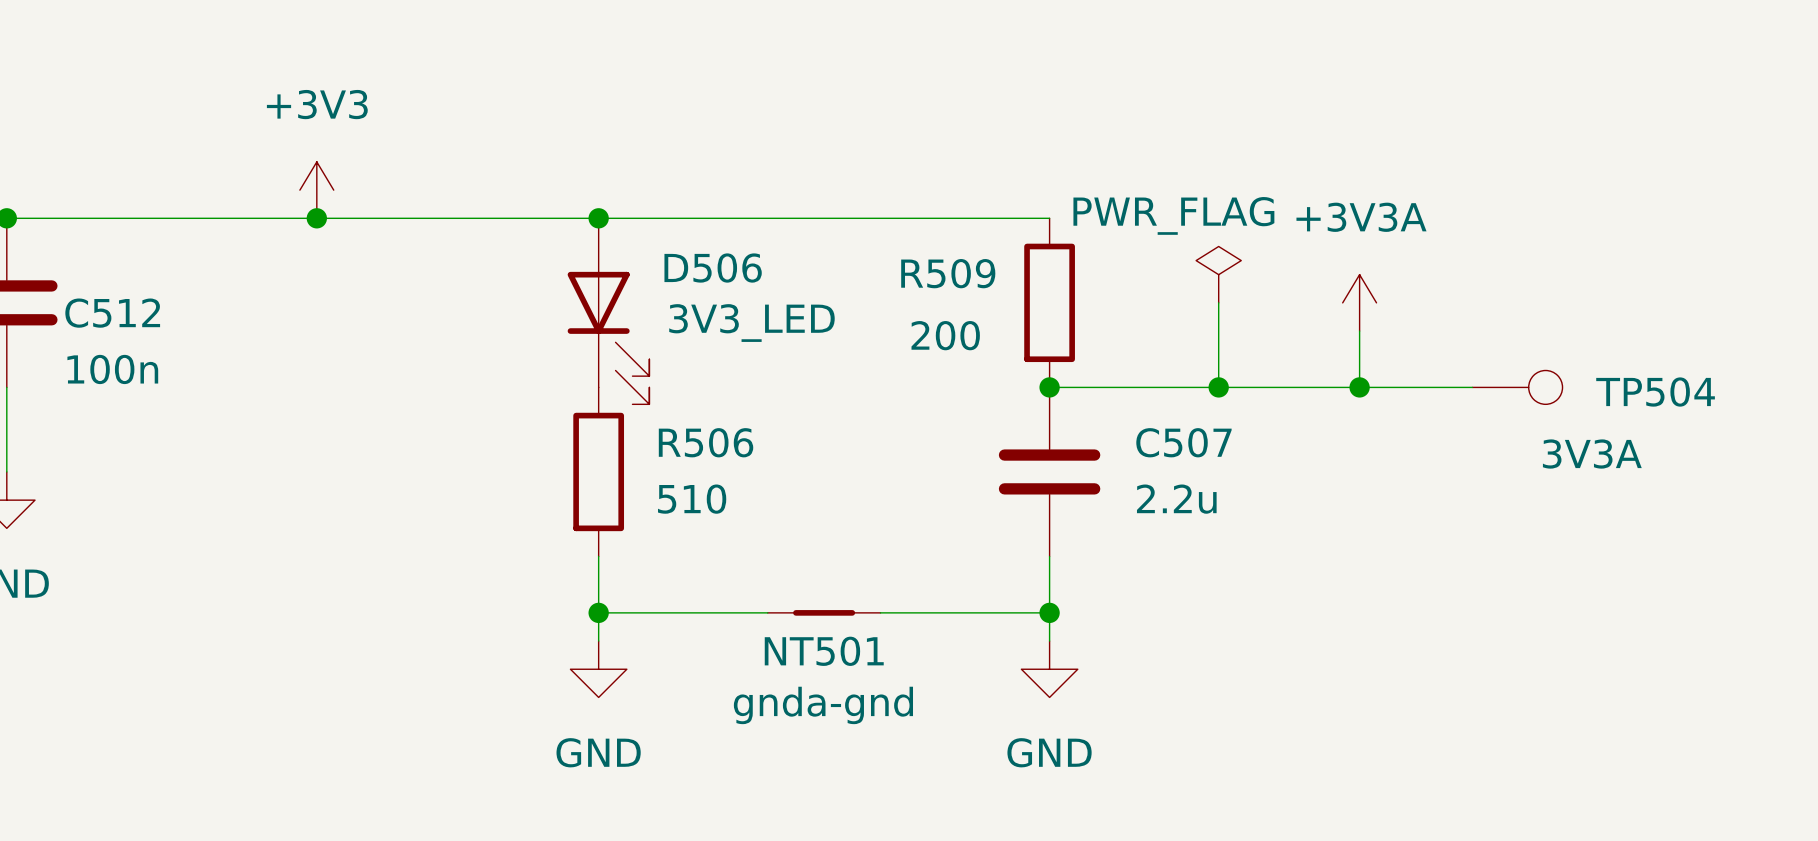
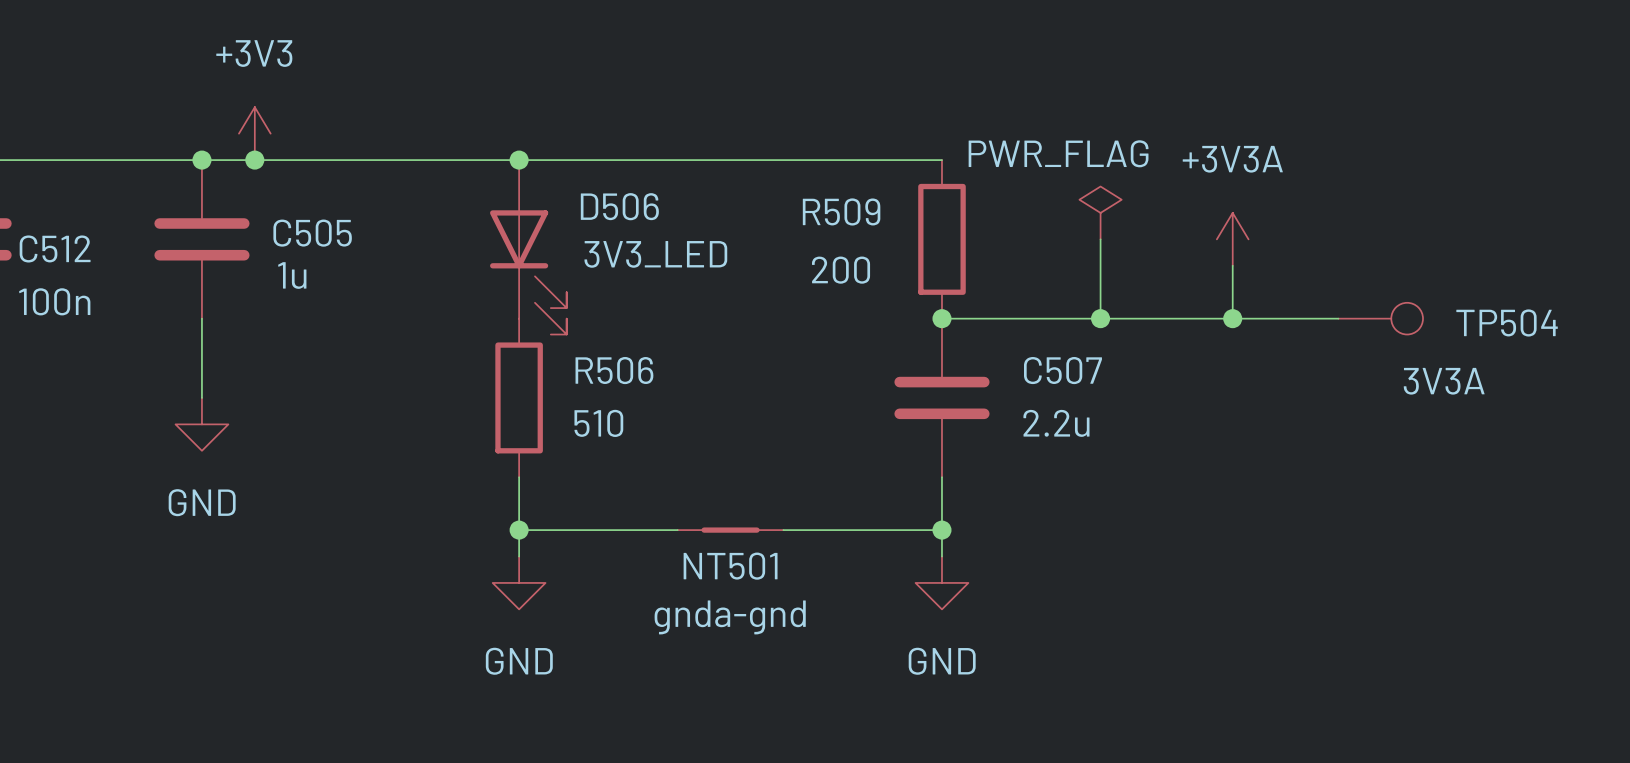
junction: none -> (201, 160)
C505: none -> 1u (201, 239)
wire: none -> (201, 318) (201, 397)
power symbol: none -> GND (201, 424)

